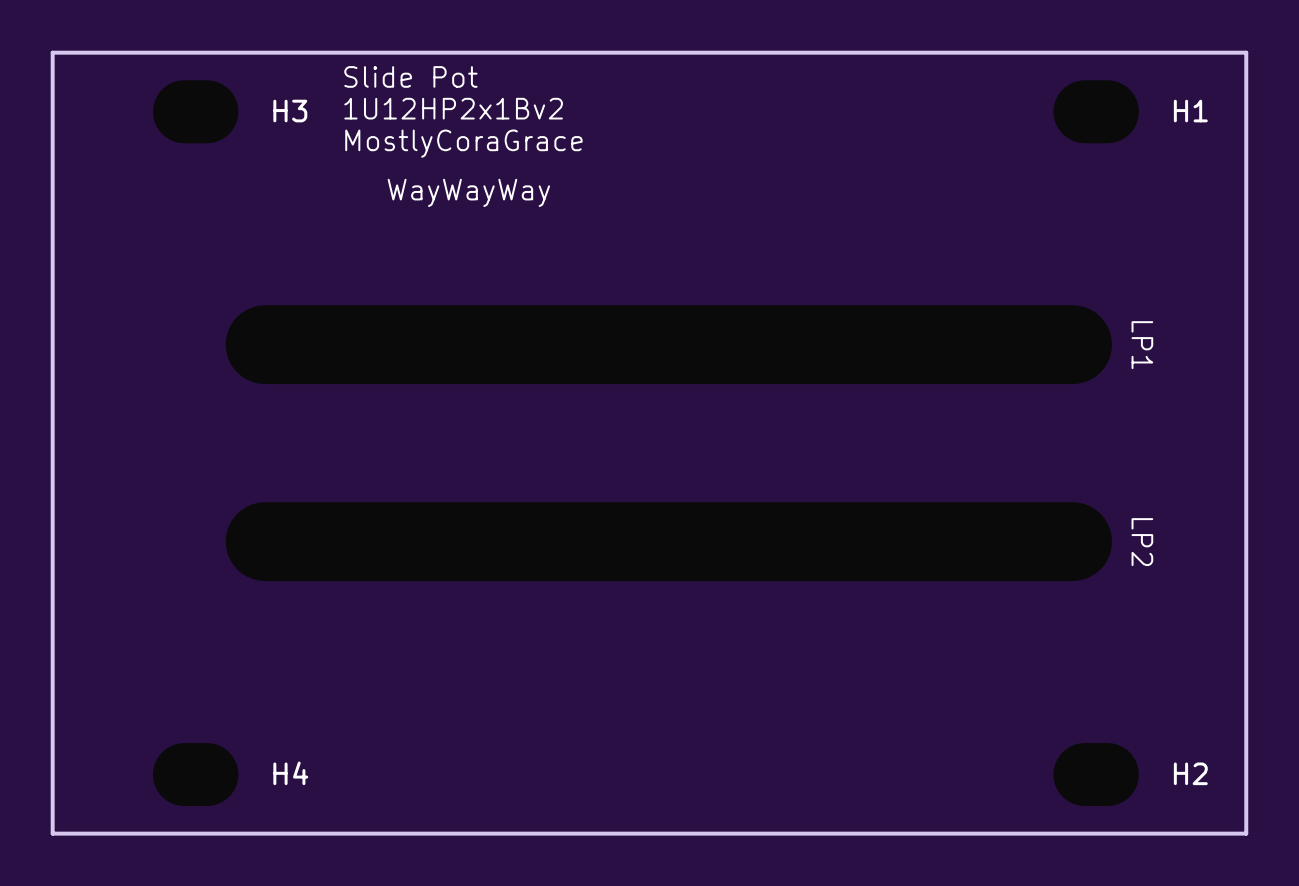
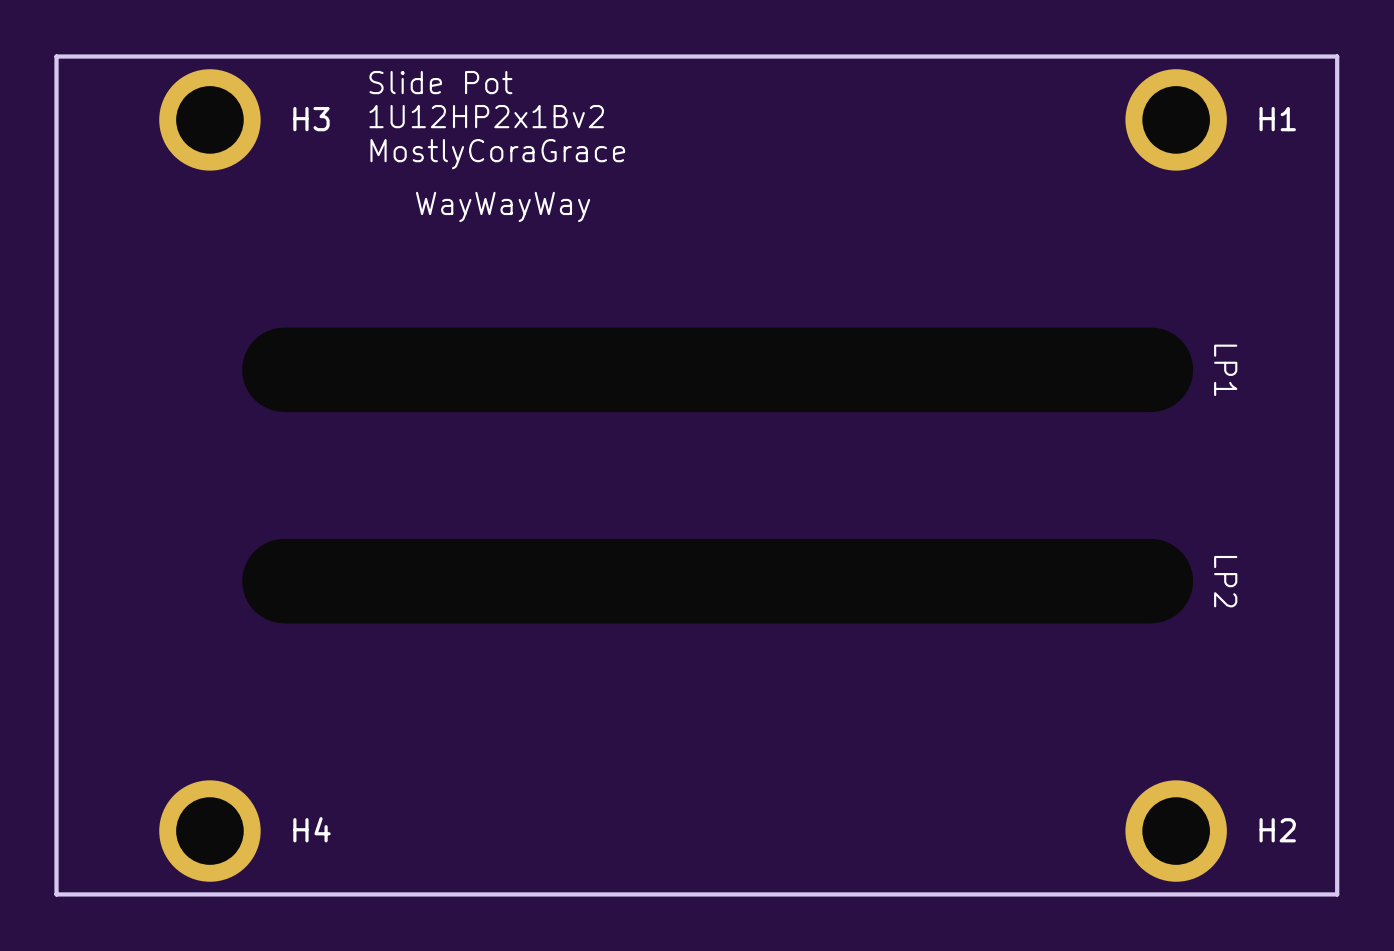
H3 footprint: [152, 80, 239, 144] -> [159, 69, 261, 171]
H1 footprint: [1053, 80, 1139, 144] -> [1125, 69, 1227, 171]
H4 footprint: [152, 743, 239, 807] -> [159, 780, 261, 882]
H2 footprint: [1053, 743, 1139, 807] -> [1125, 780, 1227, 882]

